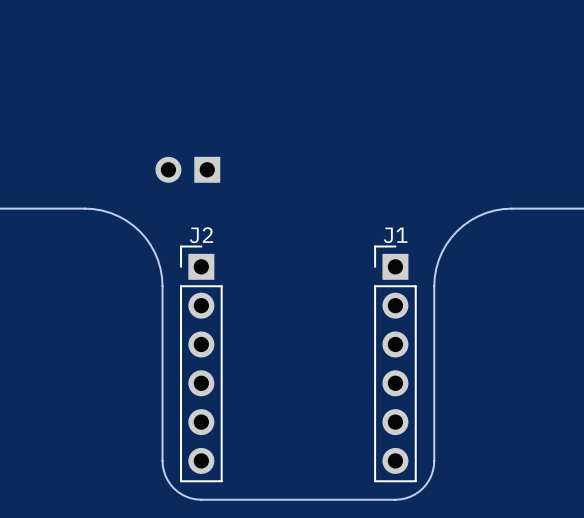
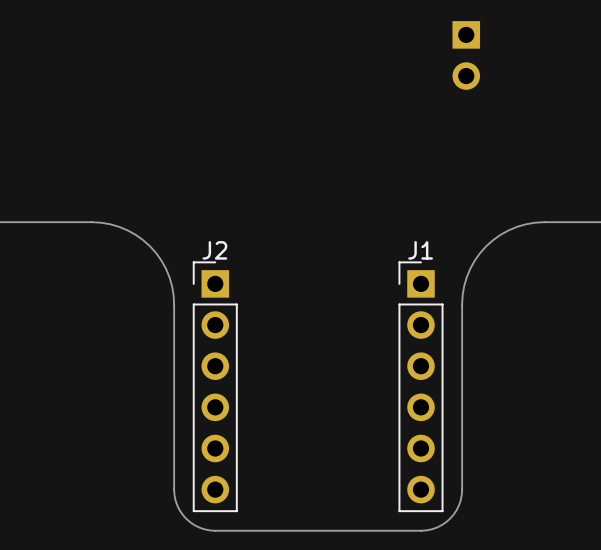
part rotation: 0° (187, 169) -> 90° counterclockwise (466, 55)
part position: (187, 169) -> (466, 55)

